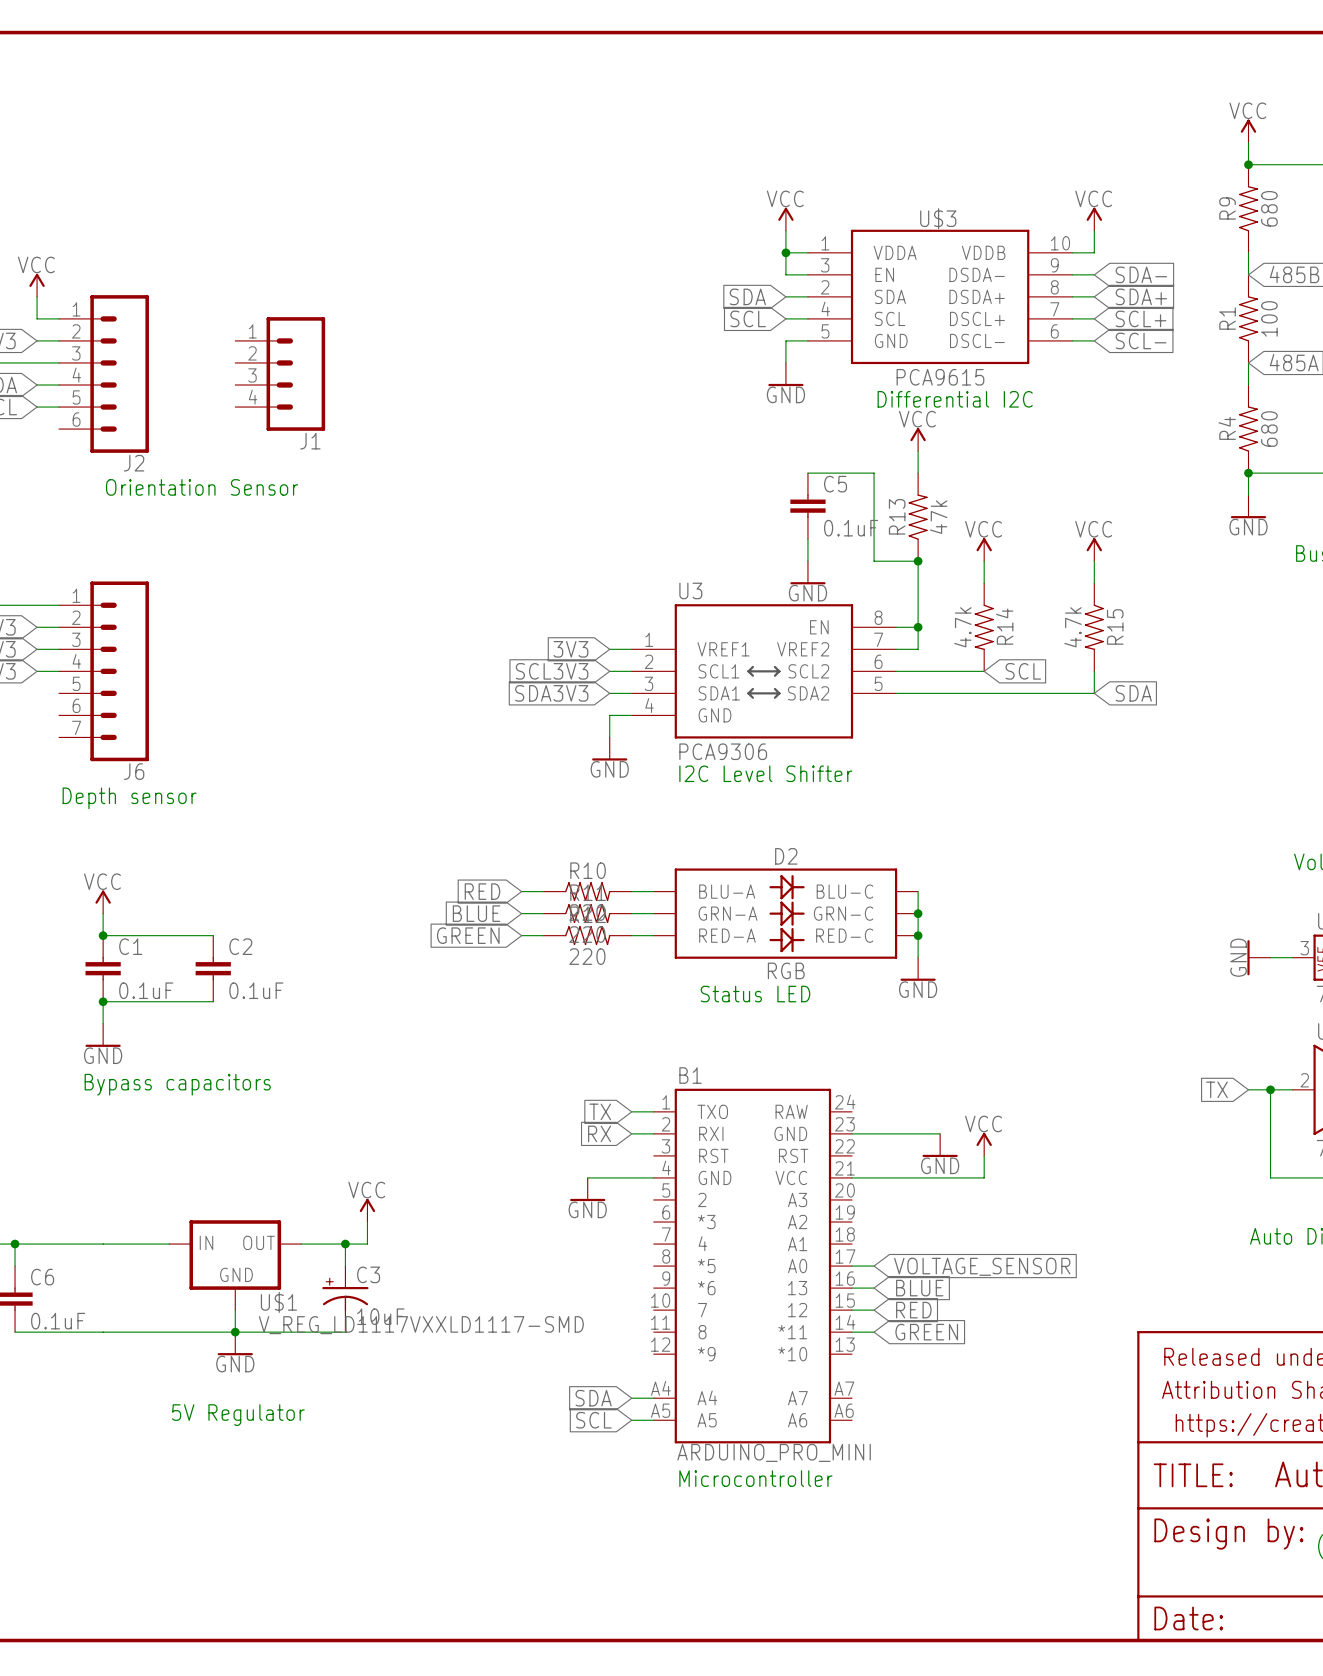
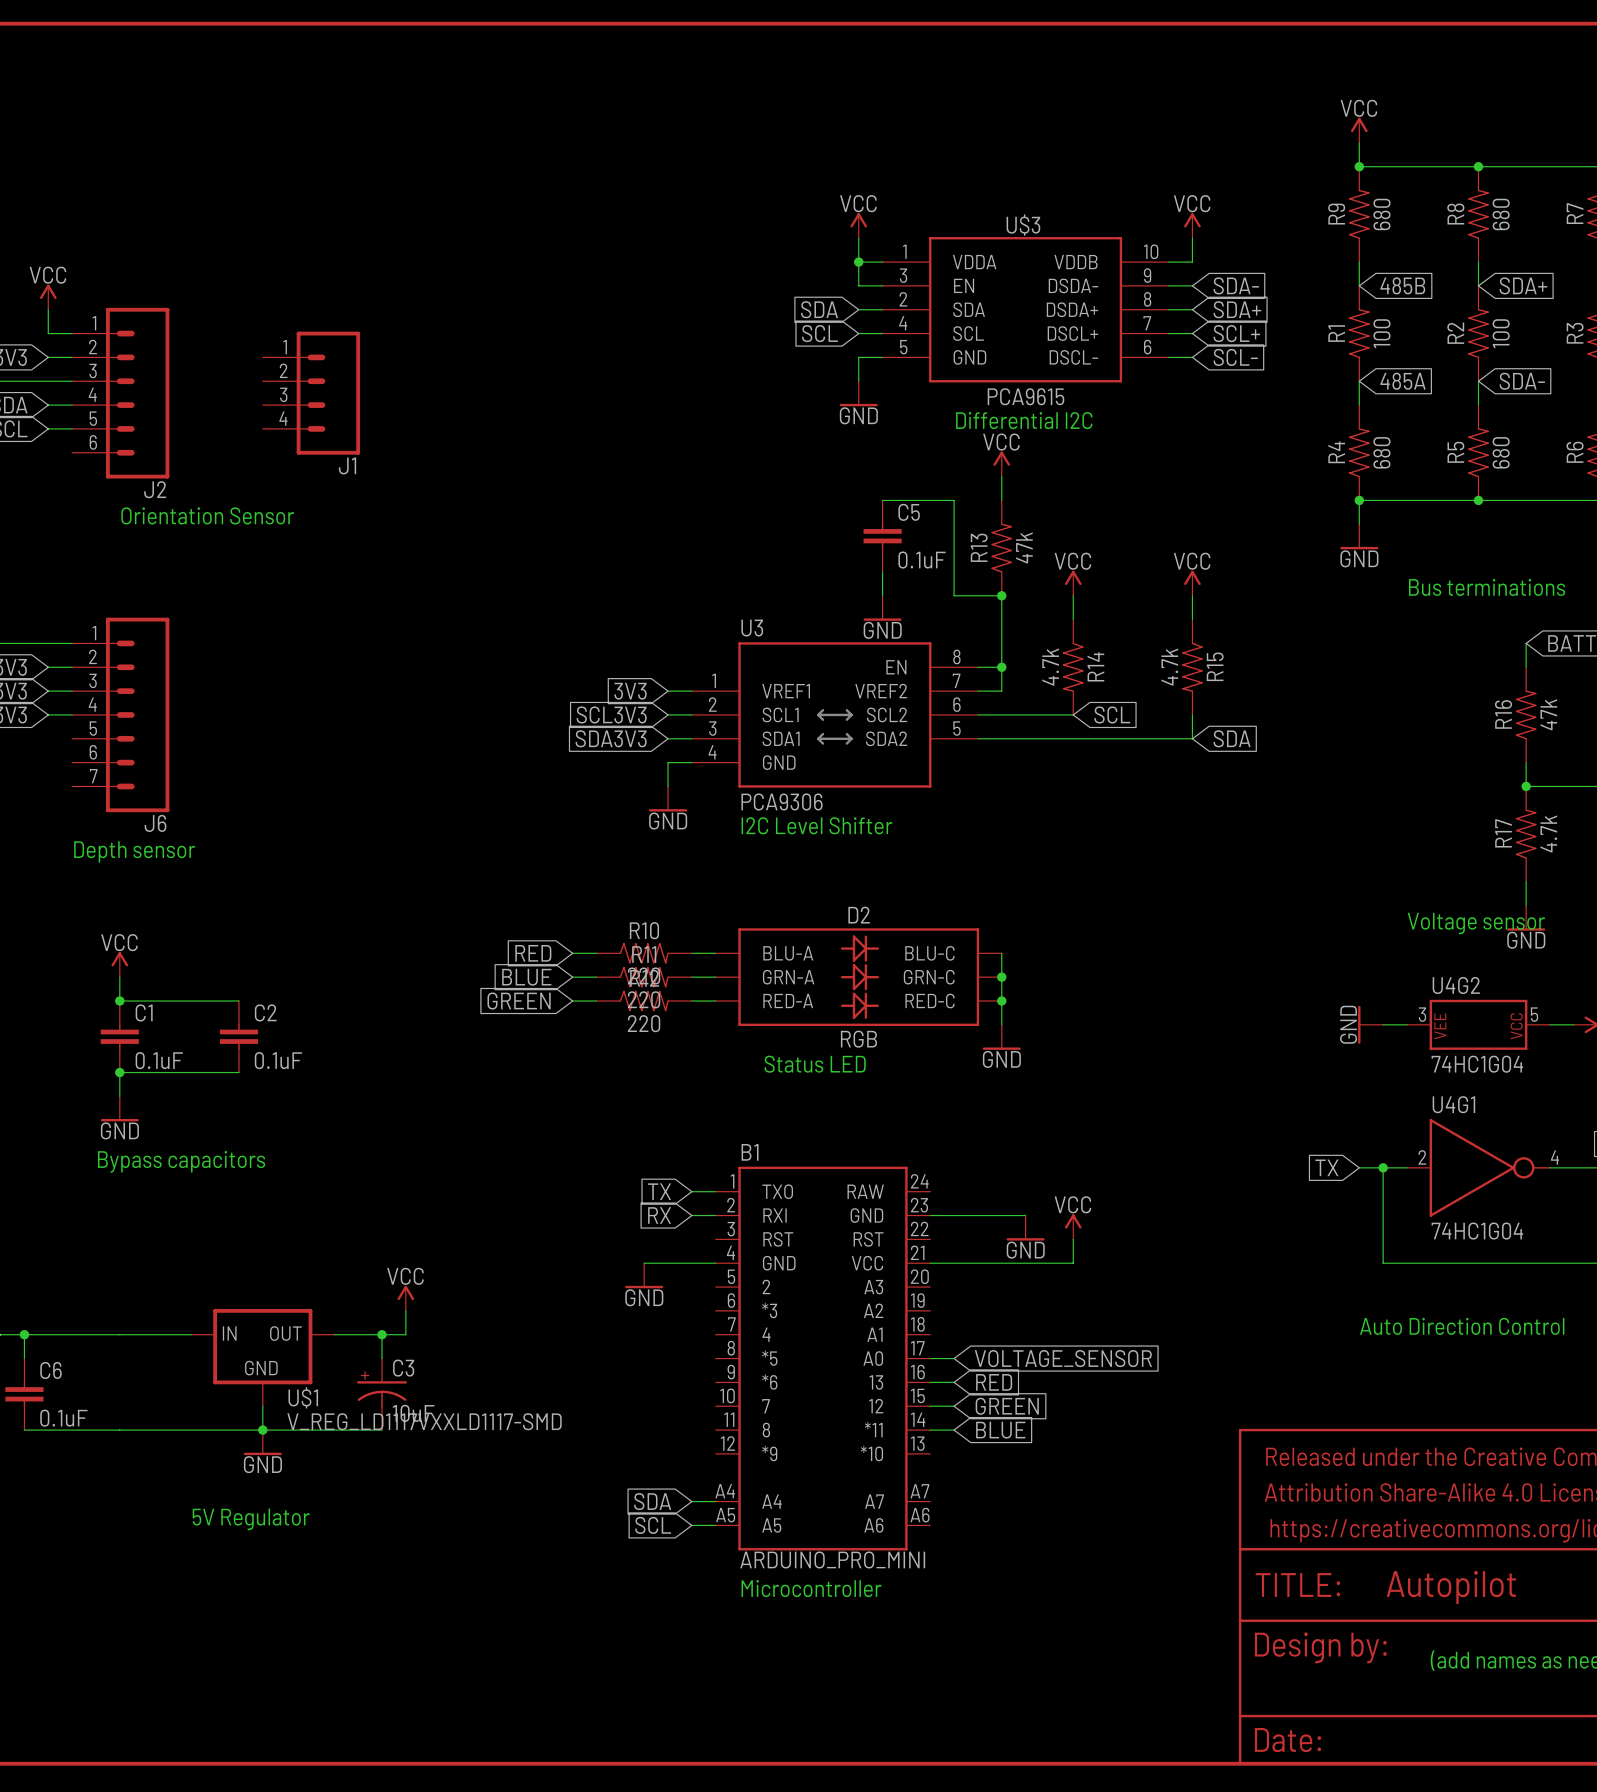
global label: BLUE (919, 1288) -> RED (994, 1382)
global label: RED (913, 1310) -> GREEN (1007, 1406)
global label: GREEN (926, 1332) -> BLUE (1000, 1430)

